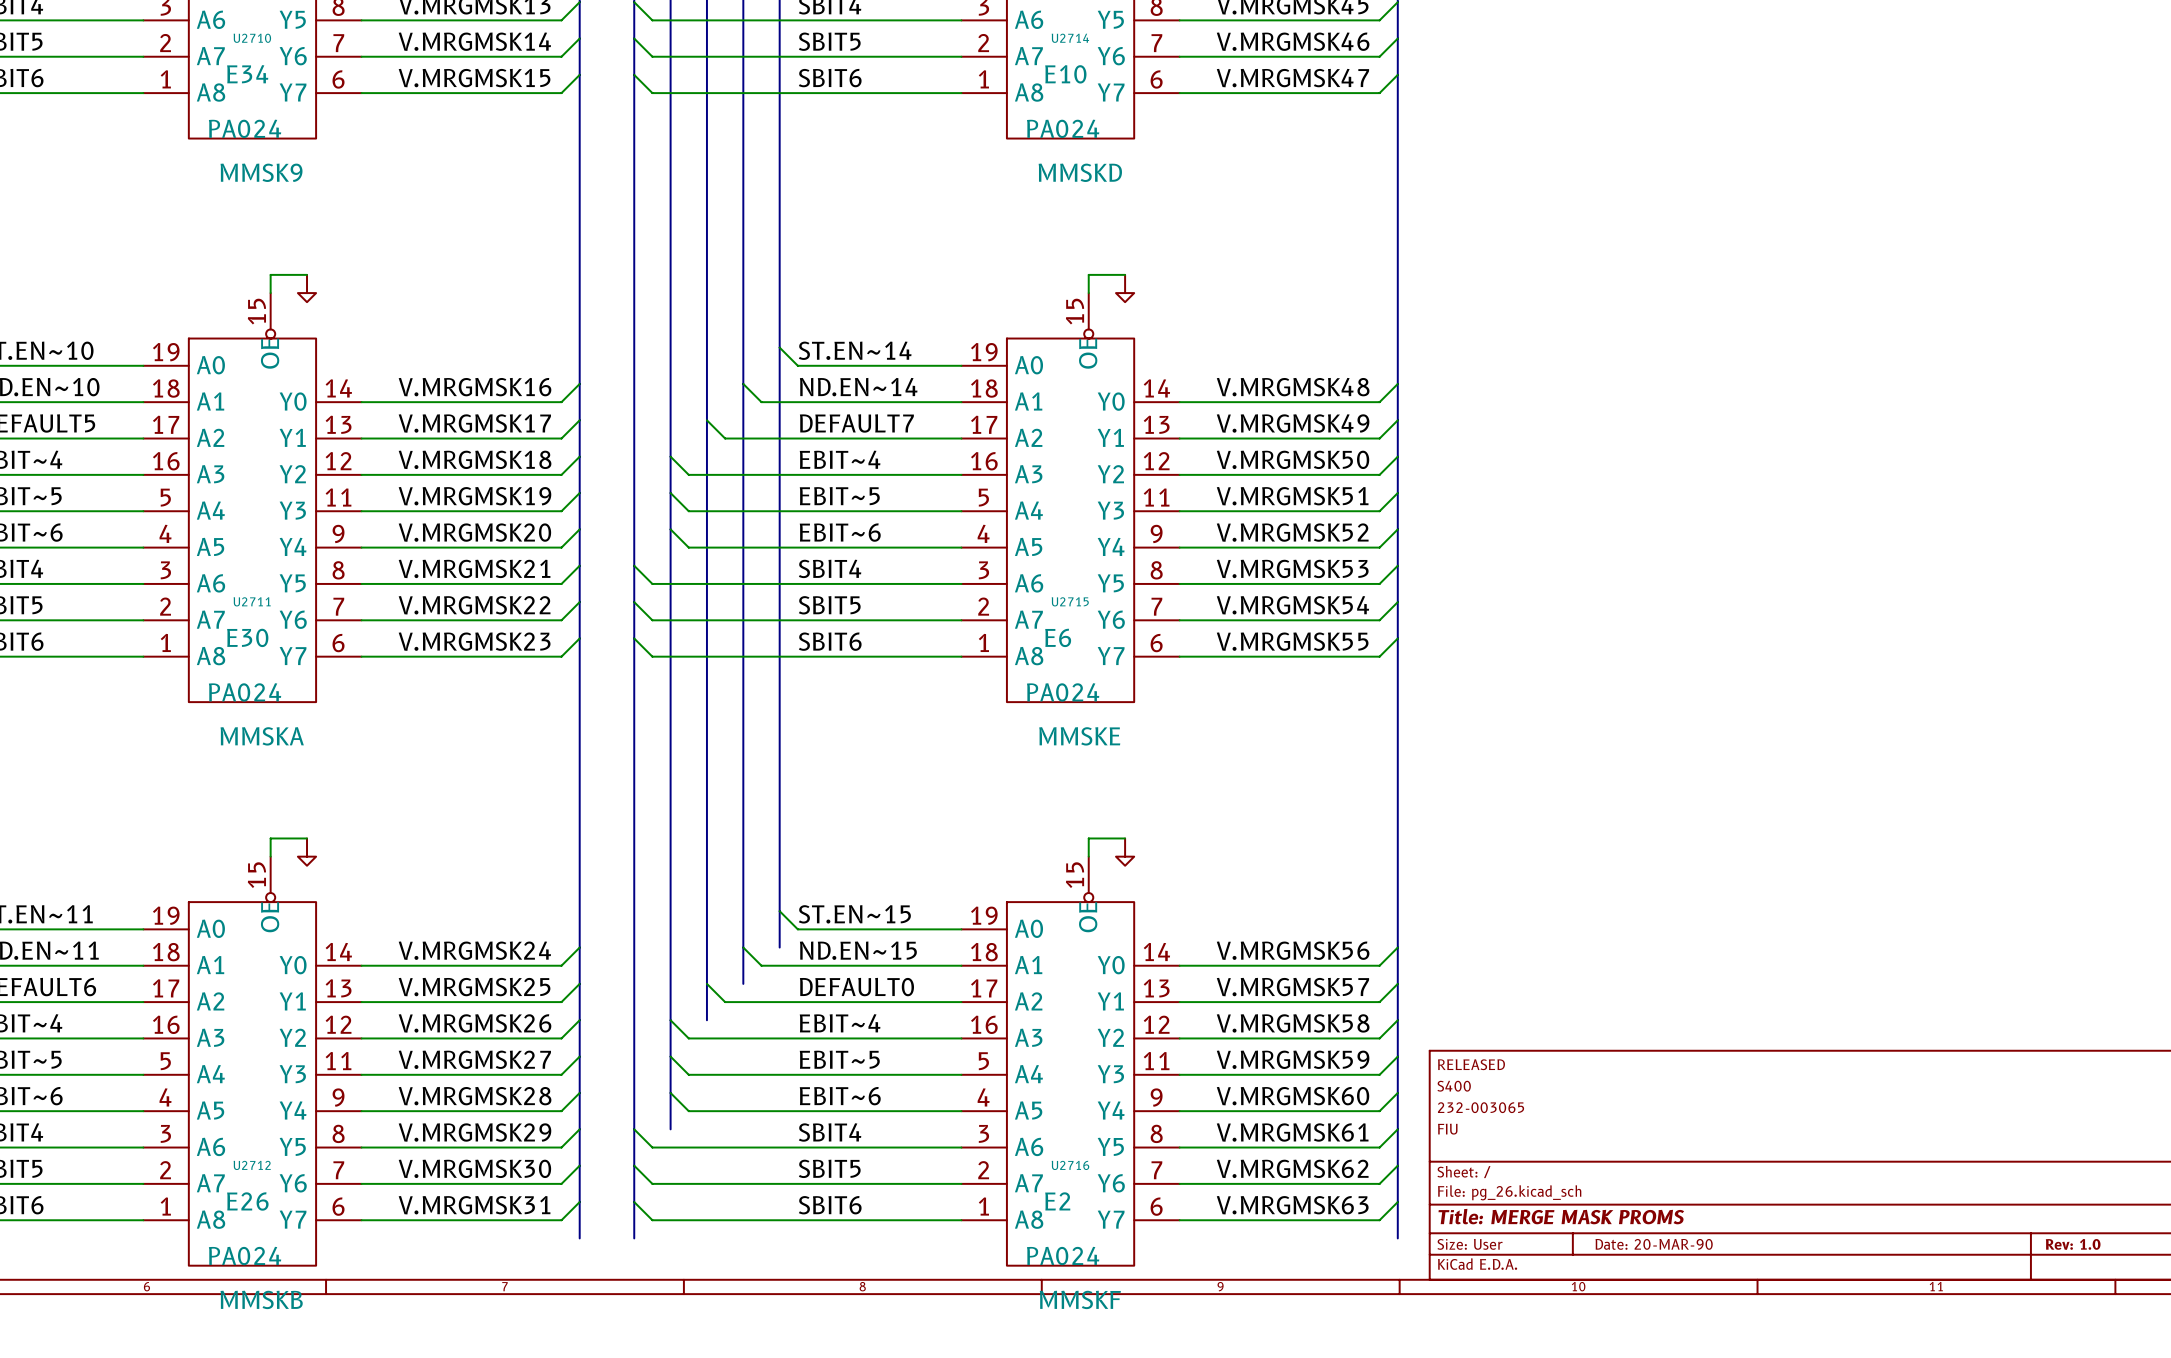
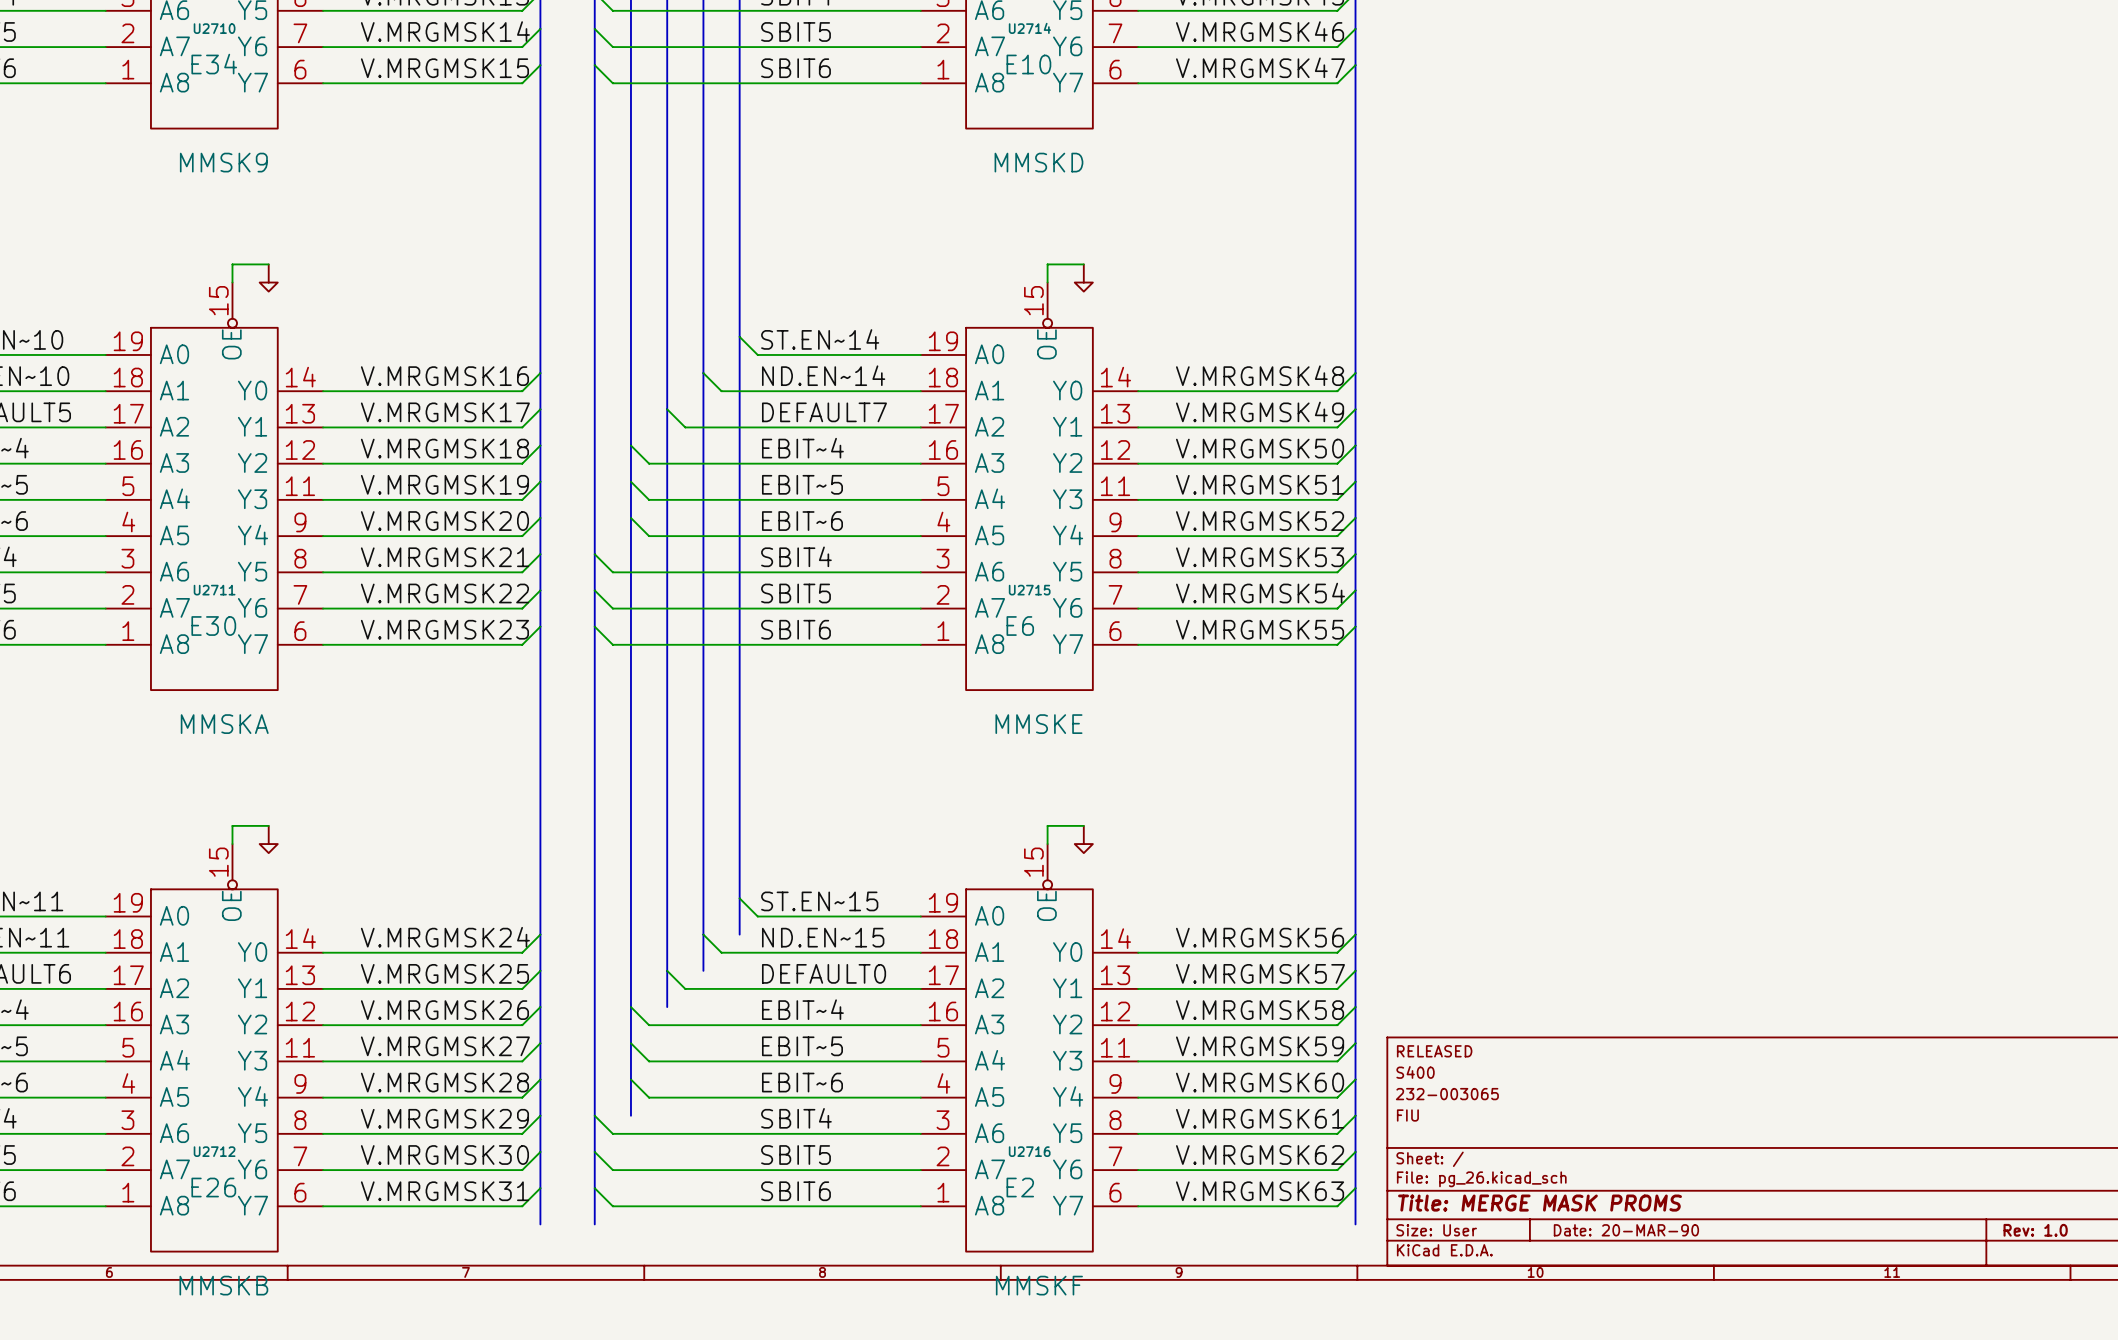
U2710 value: PA024 (245, 128) -> none
U2714 value: PA024 (1063, 128) -> none
U2711 value: PA024 (245, 692) -> none
U2715 value: PA024 (1063, 692) -> none
U2712 value: PA024 (245, 1256) -> none
U2716 value: PA024 (1063, 1256) -> none

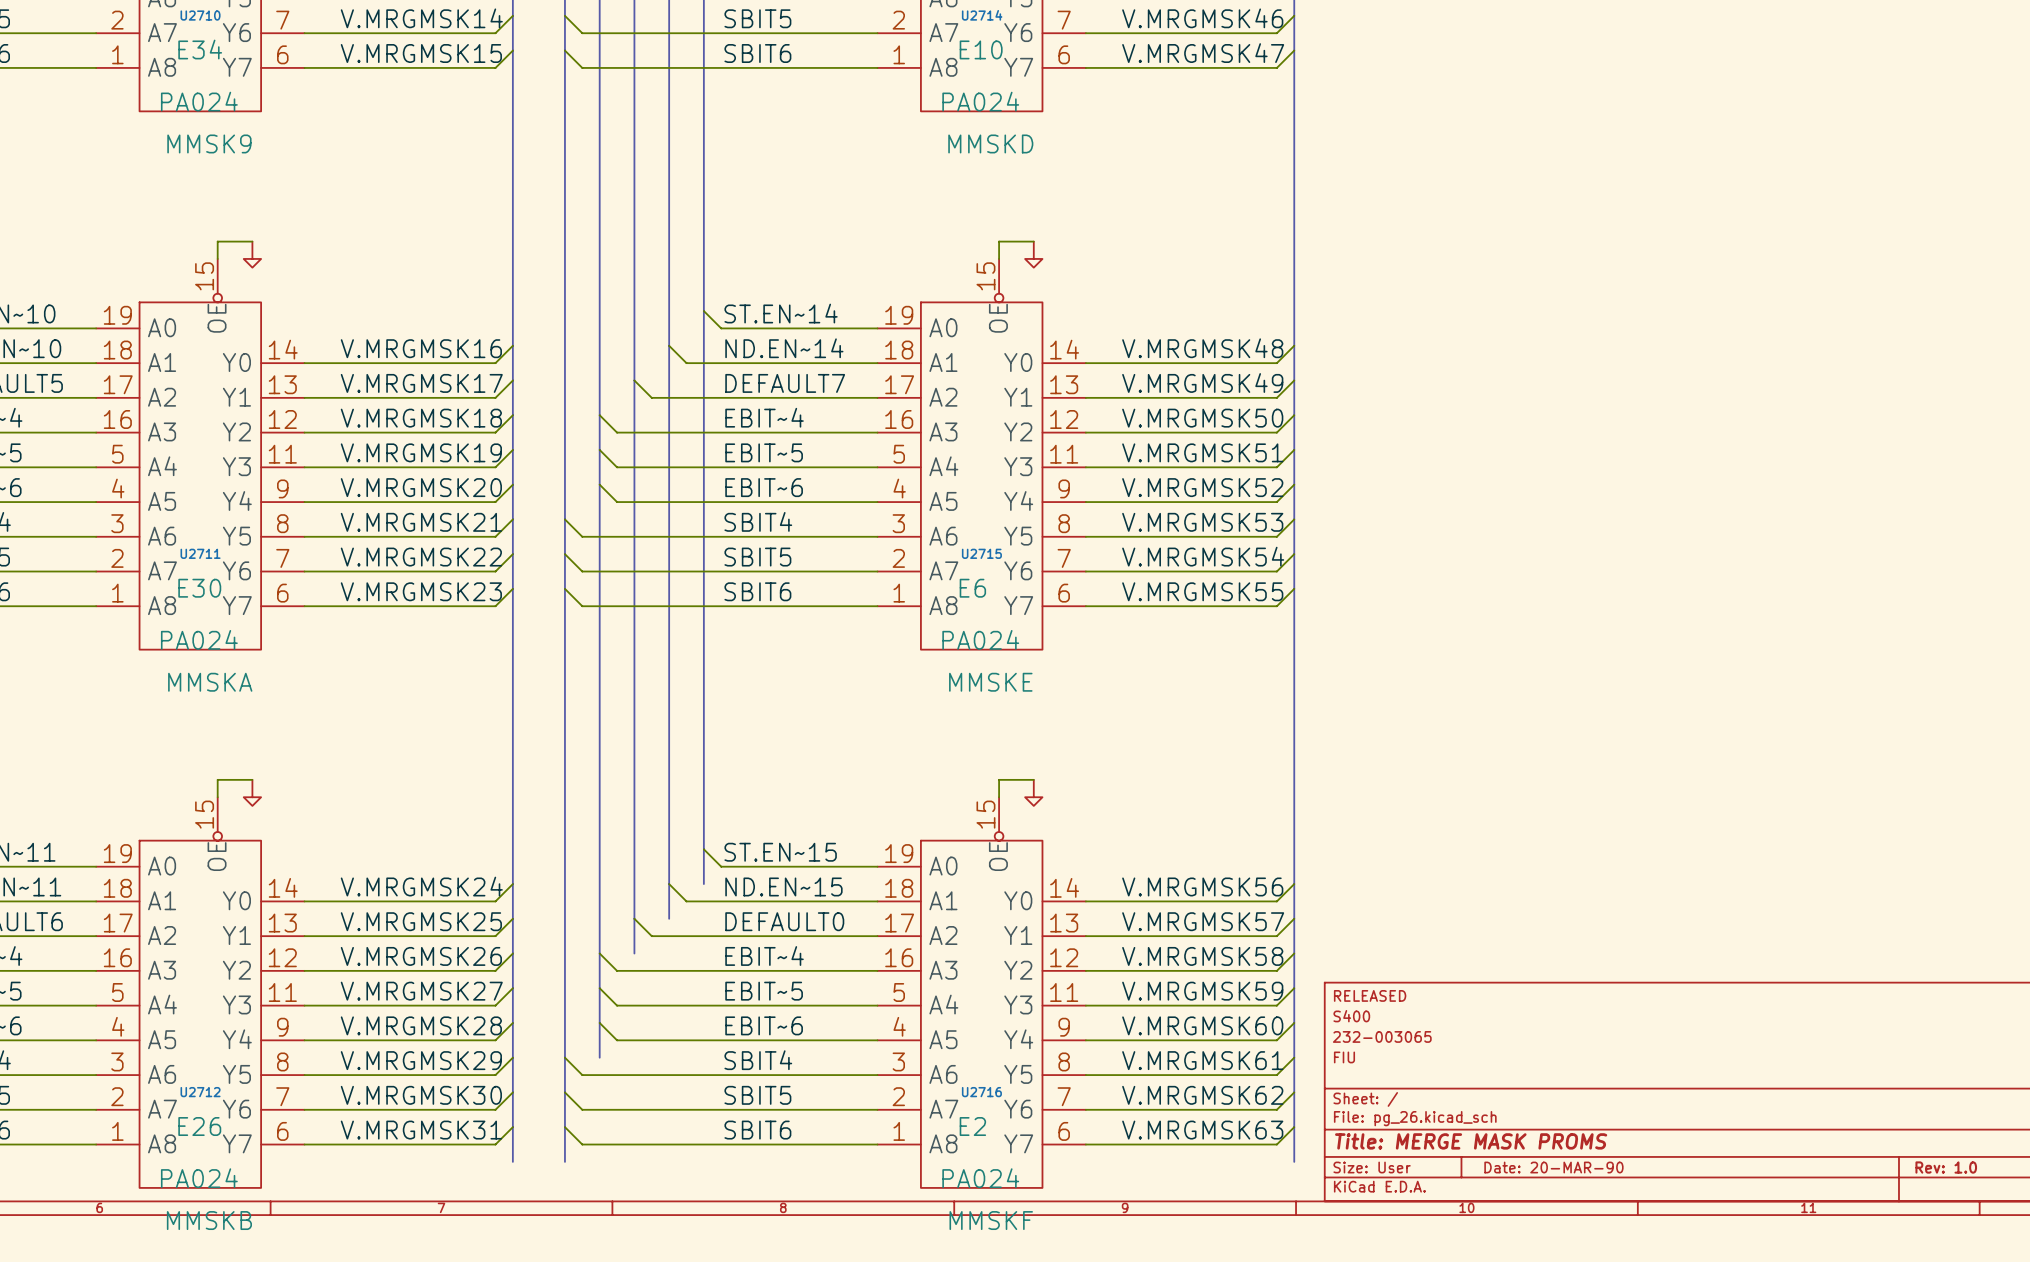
U2710 value: none -> PA024 (199, 101)
U2714 value: none -> PA024 (980, 101)
U2711 value: none -> PA024 (199, 639)
U2715 value: none -> PA024 (980, 639)
U2712 value: none -> PA024 (199, 1178)
U2716 value: none -> PA024 (980, 1178)

